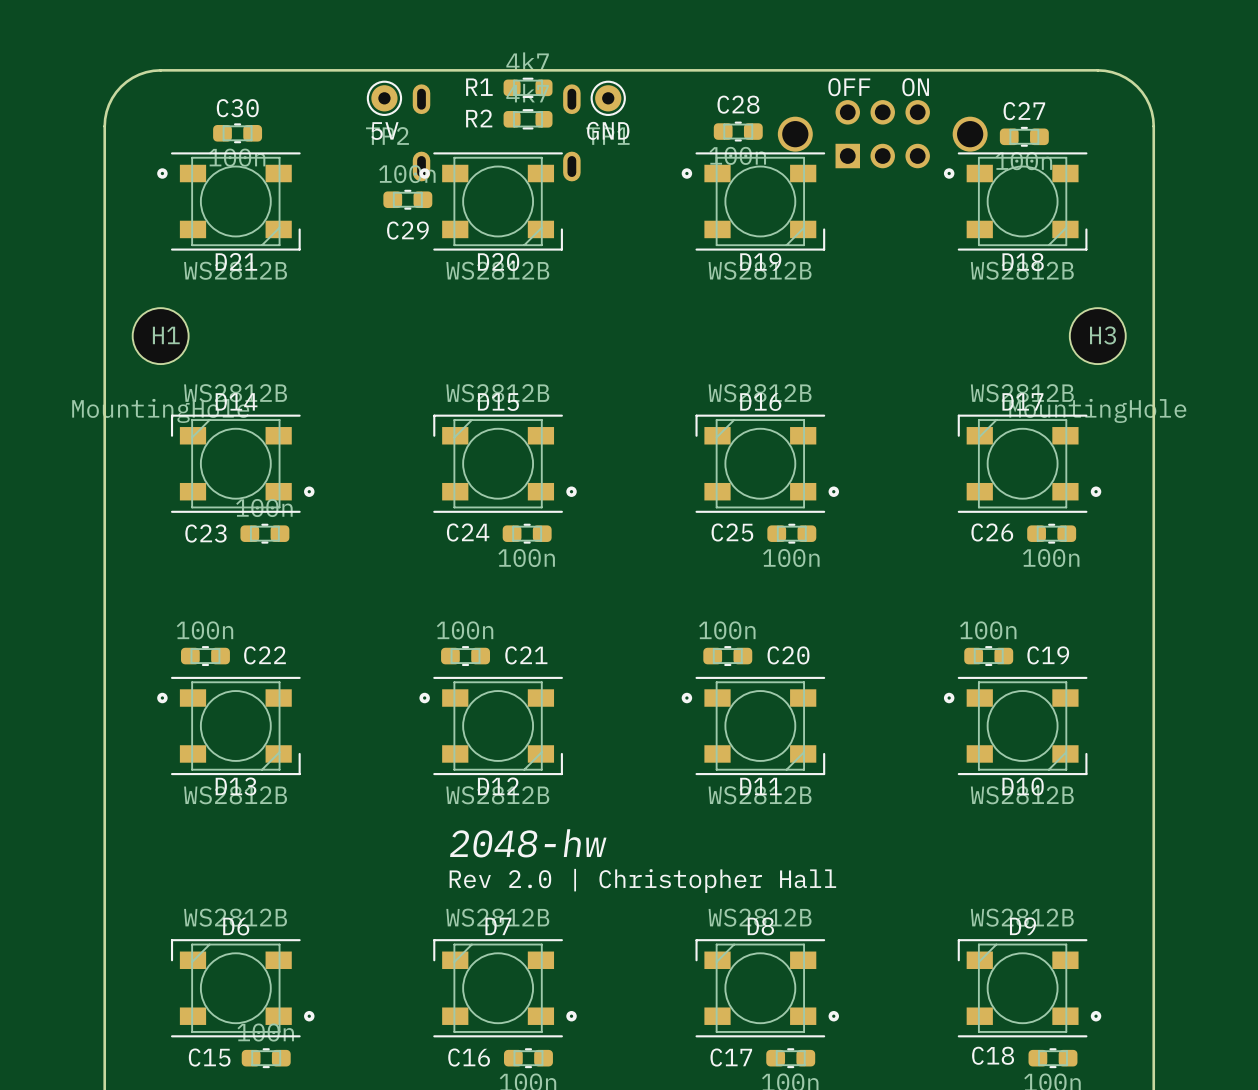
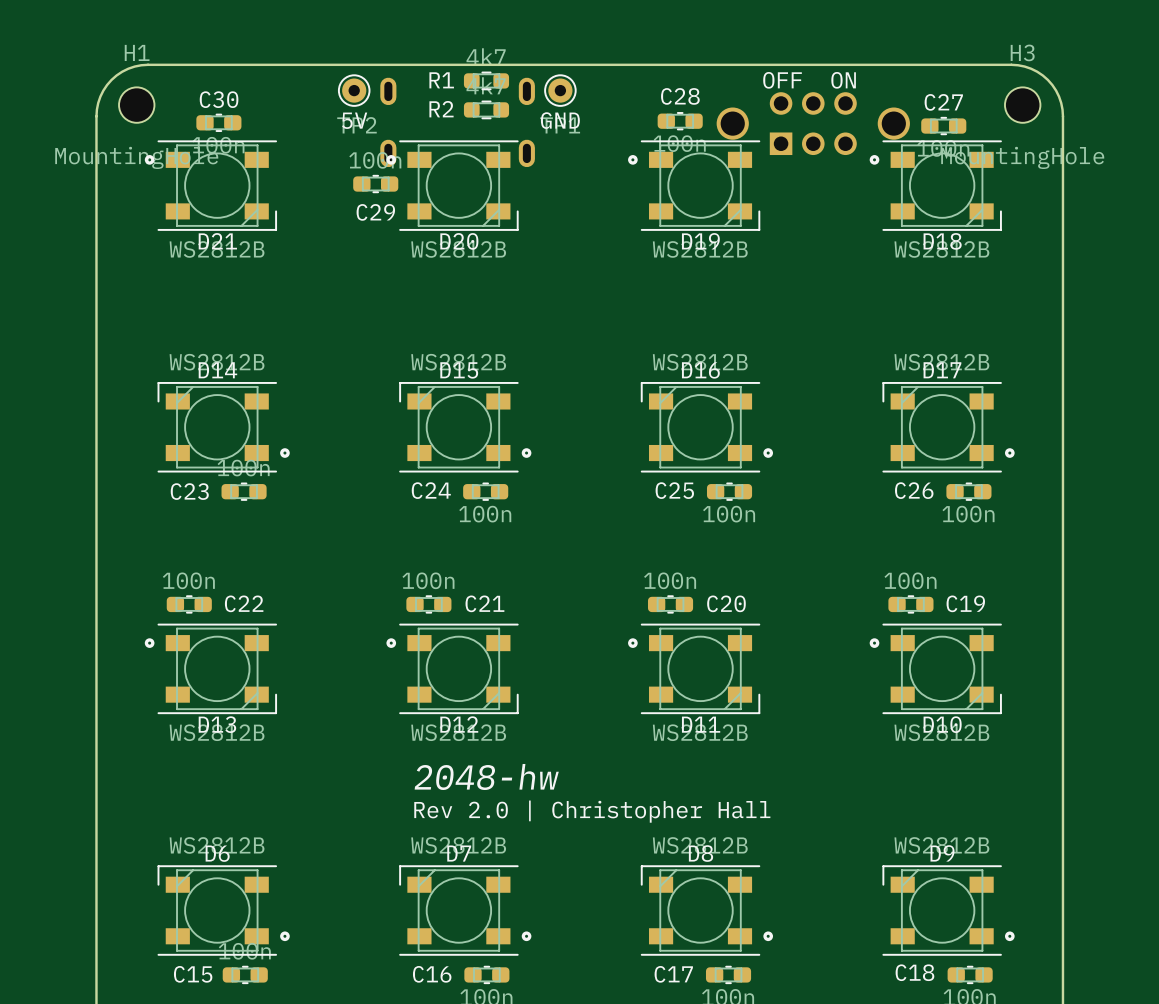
H1 footprint: [132, 308, 189, 365] -> [119, 87, 155, 123]
H3 footprint: [1069, 308, 1126, 365] -> [1004, 87, 1041, 123]
H1 name position: H1 (166, 335) -> H1 (137, 52)
H3 name position: H3 (1103, 335) -> H3 (1022, 52)

